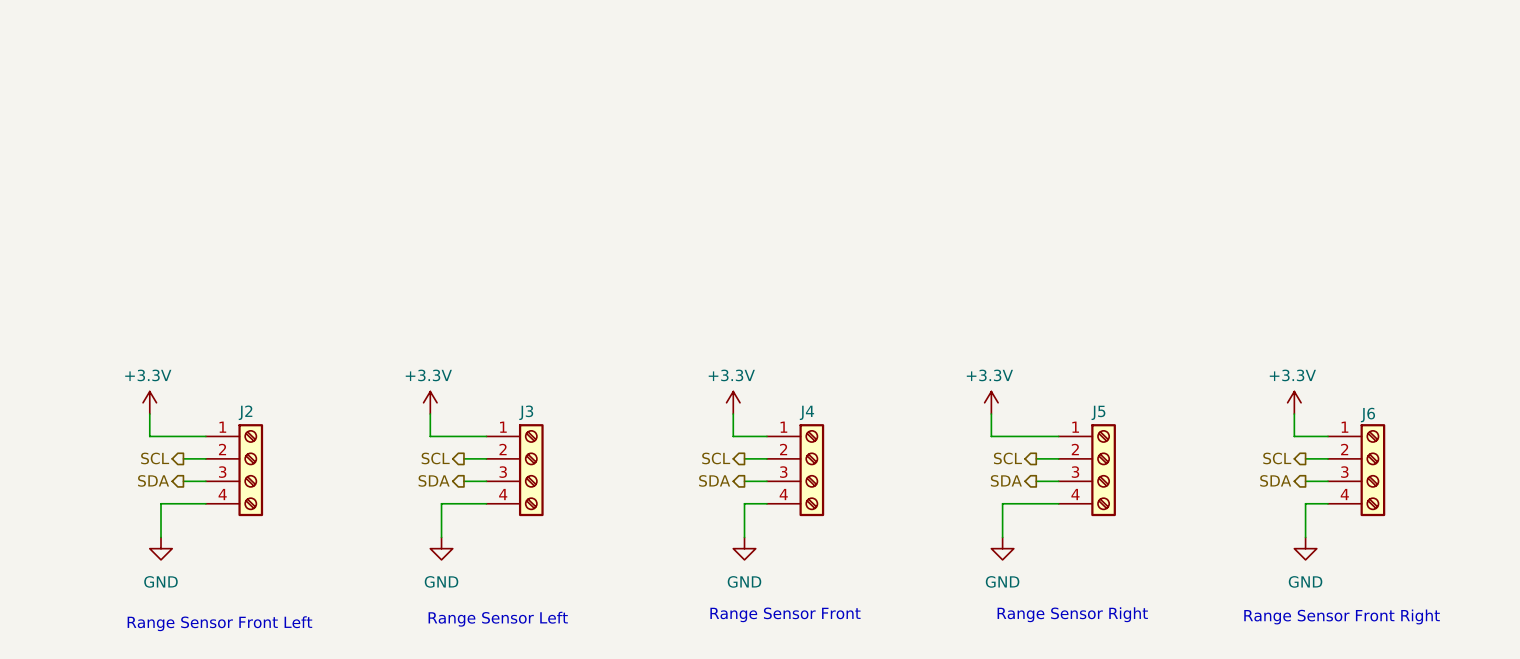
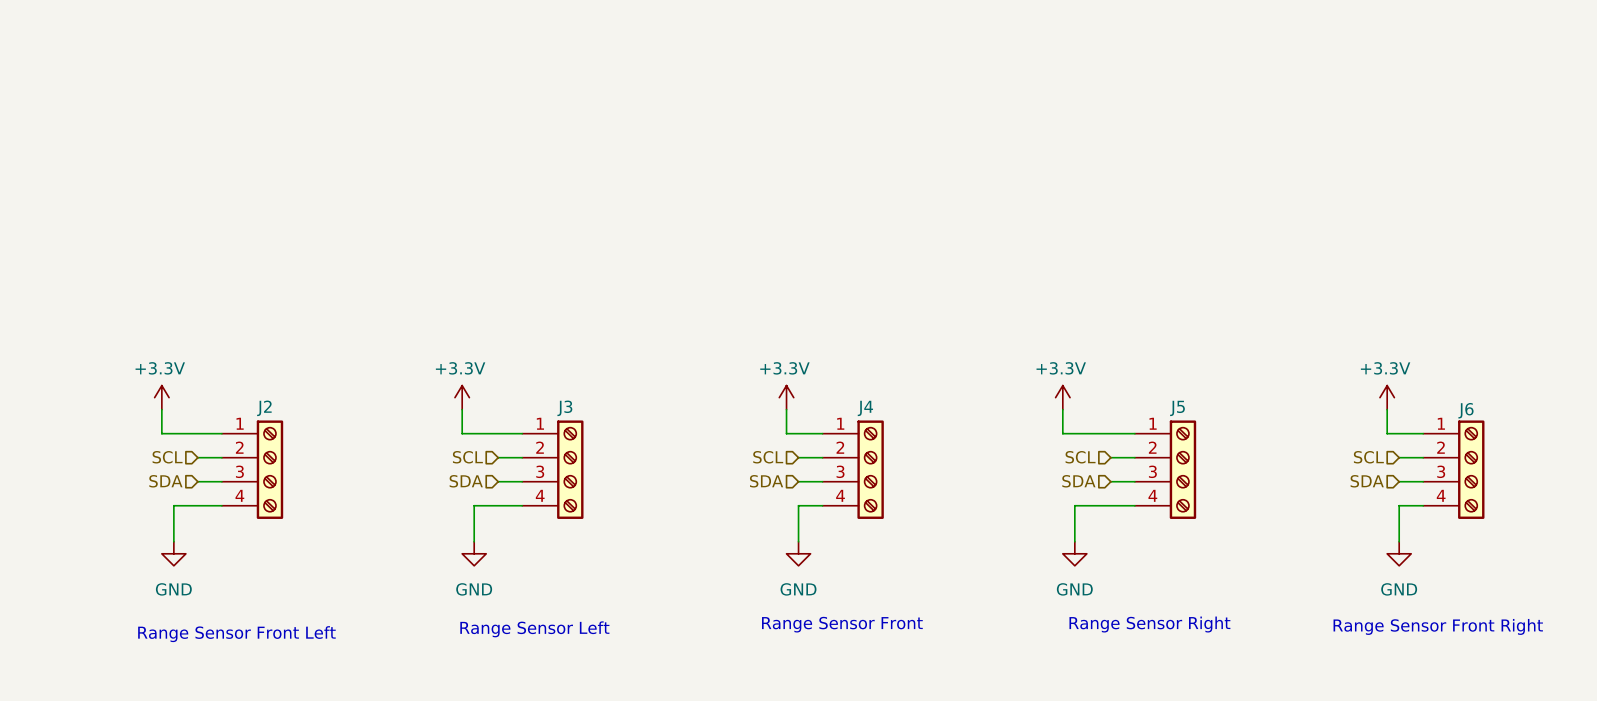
hierarchical label shape: output (155, 458) -> input (167, 457)
hierarchical label shape: output (435, 458) -> input (467, 457)
hierarchical label shape: output (716, 458) -> input (768, 457)
hierarchical label shape: output (1007, 458) -> input (1080, 457)
hierarchical label shape: output (1277, 458) -> input (1368, 457)
hierarchical label shape: output (153, 480) -> input (165, 481)
hierarchical label shape: output (434, 480) -> input (466, 481)
hierarchical label shape: output (714, 480) -> input (766, 481)
hierarchical label shape: output (1006, 480) -> input (1078, 481)
hierarchical label shape: output (1275, 480) -> input (1367, 481)

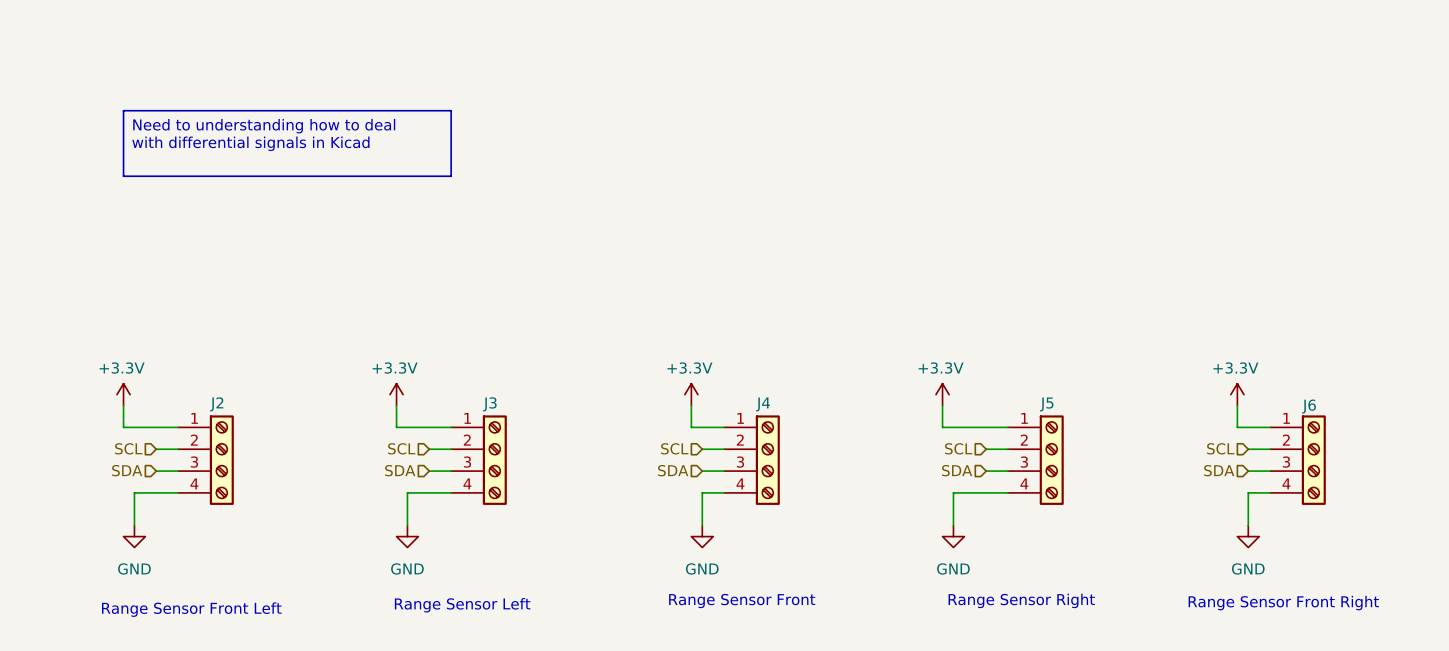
line: none -> (123, 110) (451, 110) (451, 176) (123, 176) (123, 110)
text: none -> Need to understanding how to deal (264, 126)
text: none -> with differential signals in Kicad (250, 143)

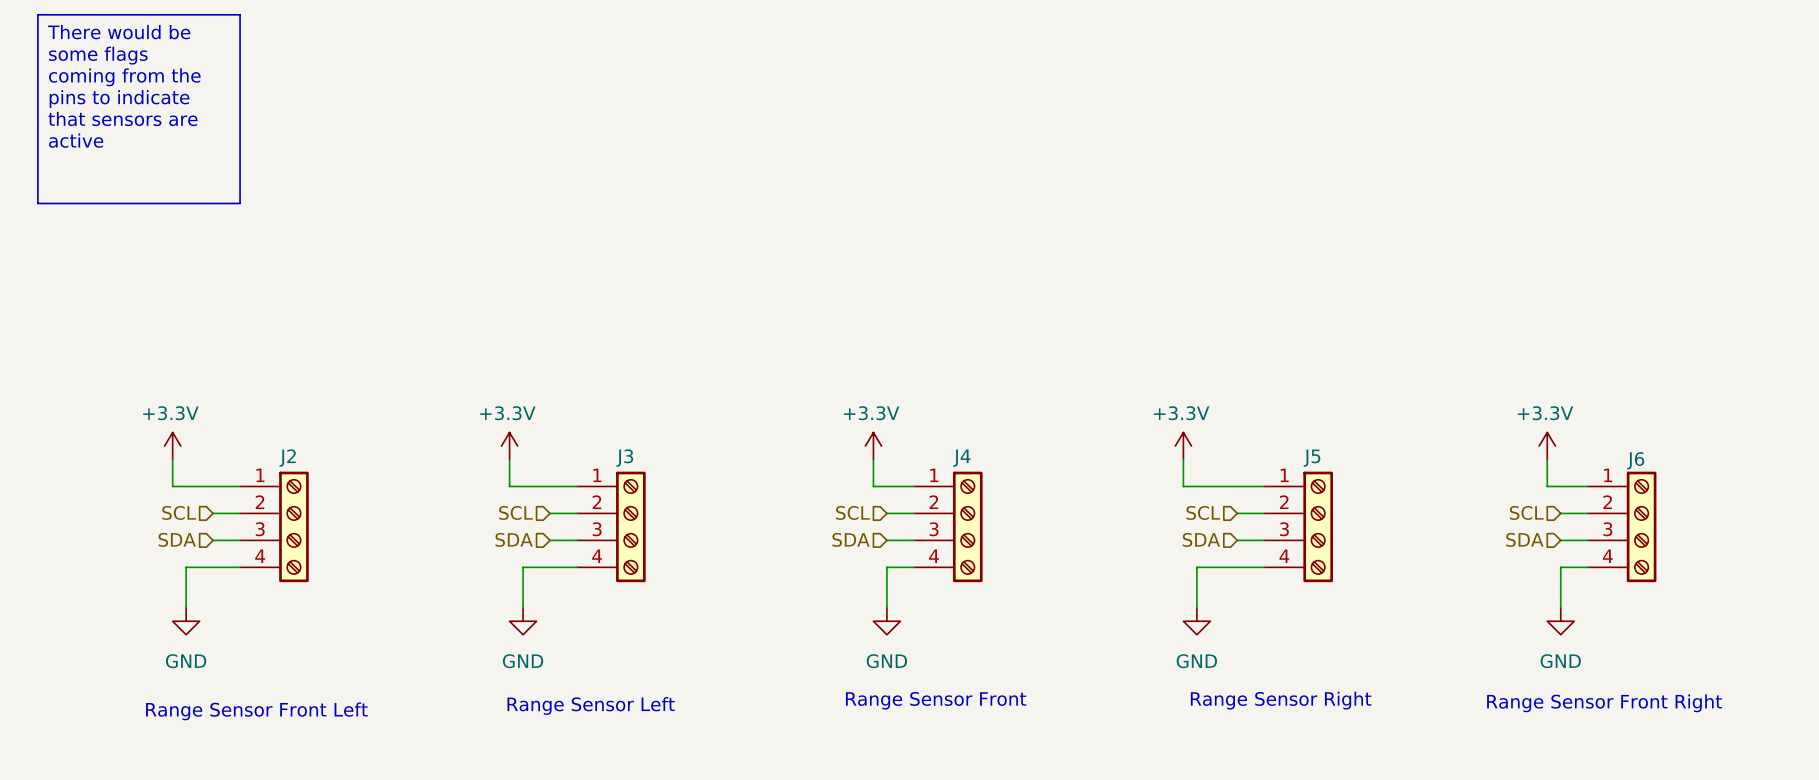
line: none -> (37, 14) (240, 14) (240, 203) (37, 203) (37, 14)
text: none -> There would be (119, 32)
text: none -> some flags (98, 55)
text: none -> coming from the (124, 77)
line: (123, 110) (451, 110) (451, 176) (123, 176) (123, 110) -> none
text: none -> pins to indicate (119, 99)
text: Need to understanding how to deal (264, 126) -> none
text: none -> that sensors are (123, 118)
text: with differential signals in Kicad (250, 143) -> none
text: none -> active (76, 140)

